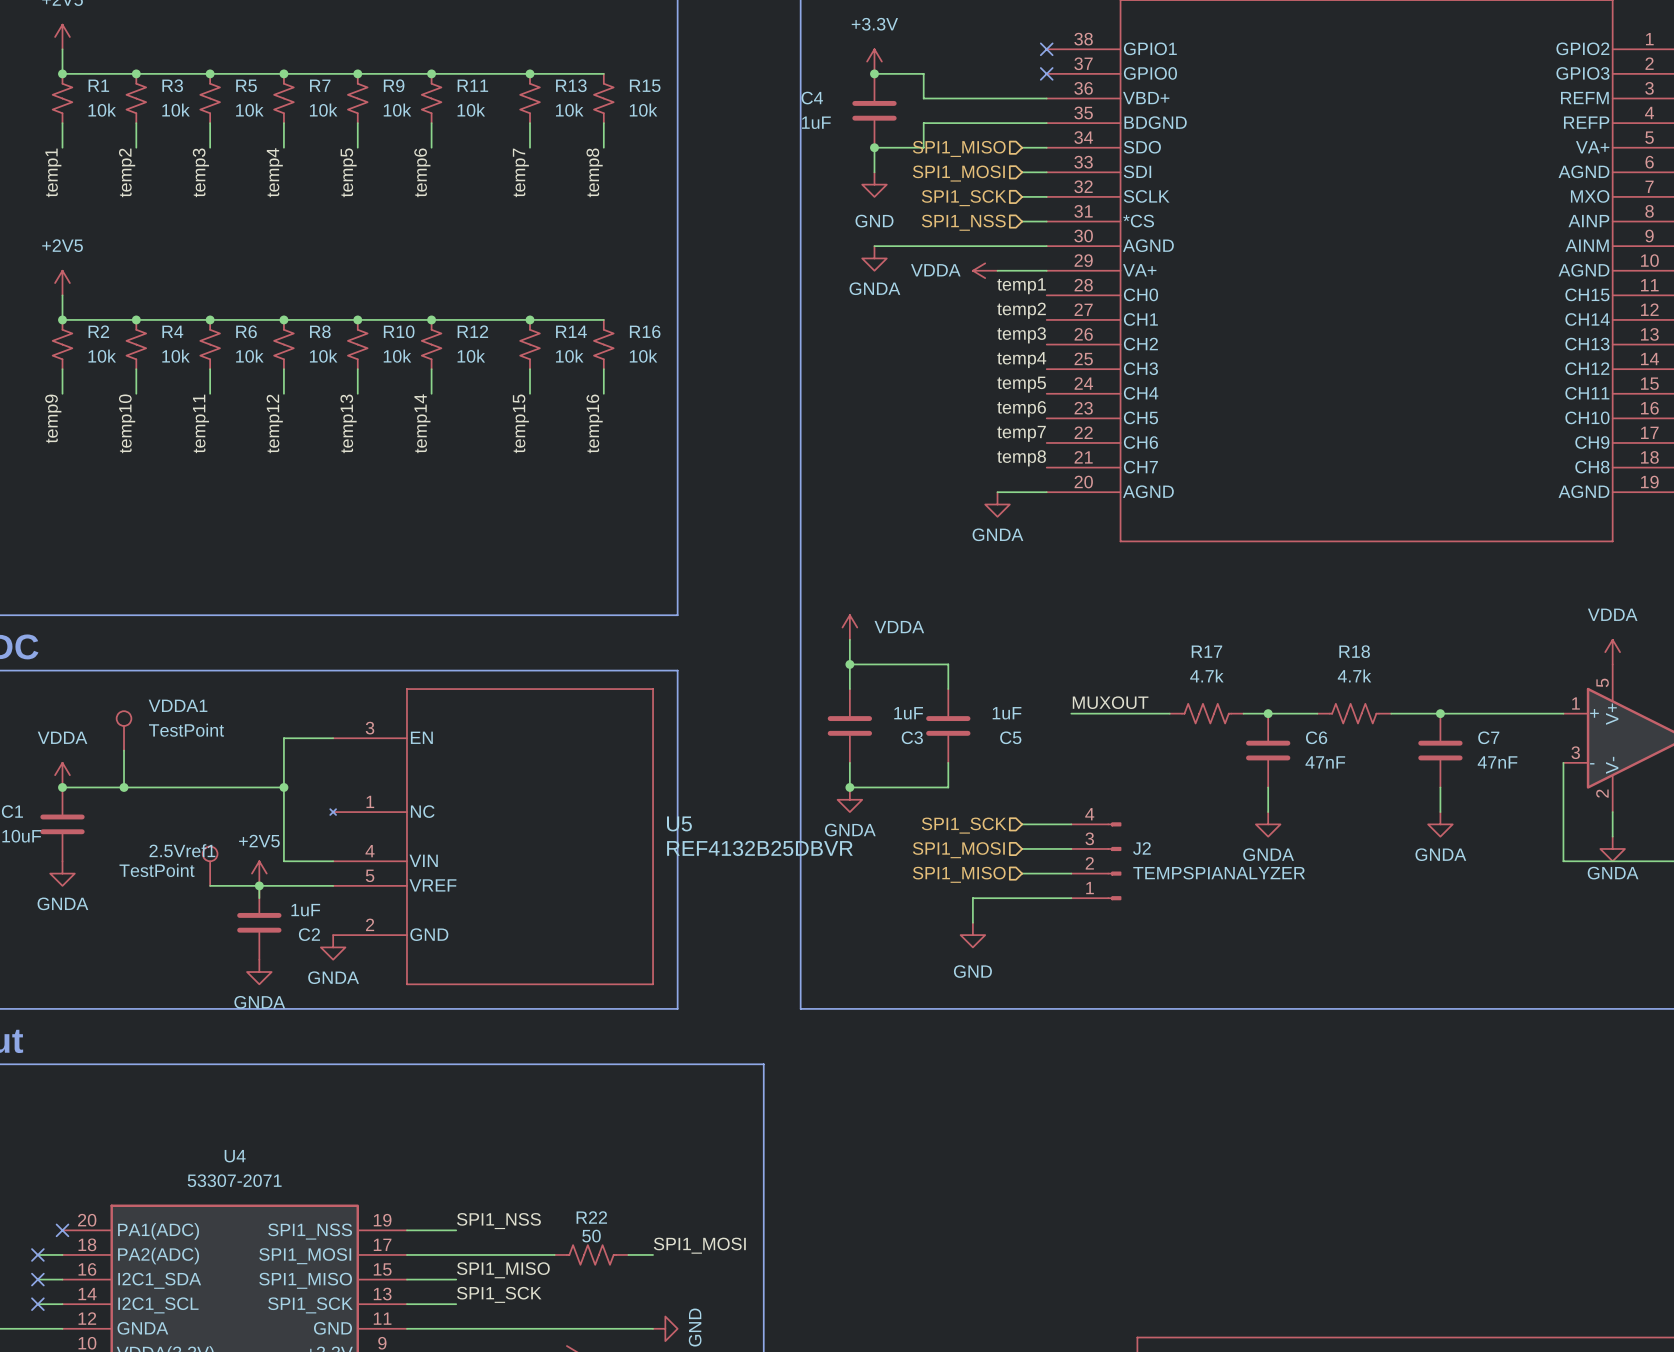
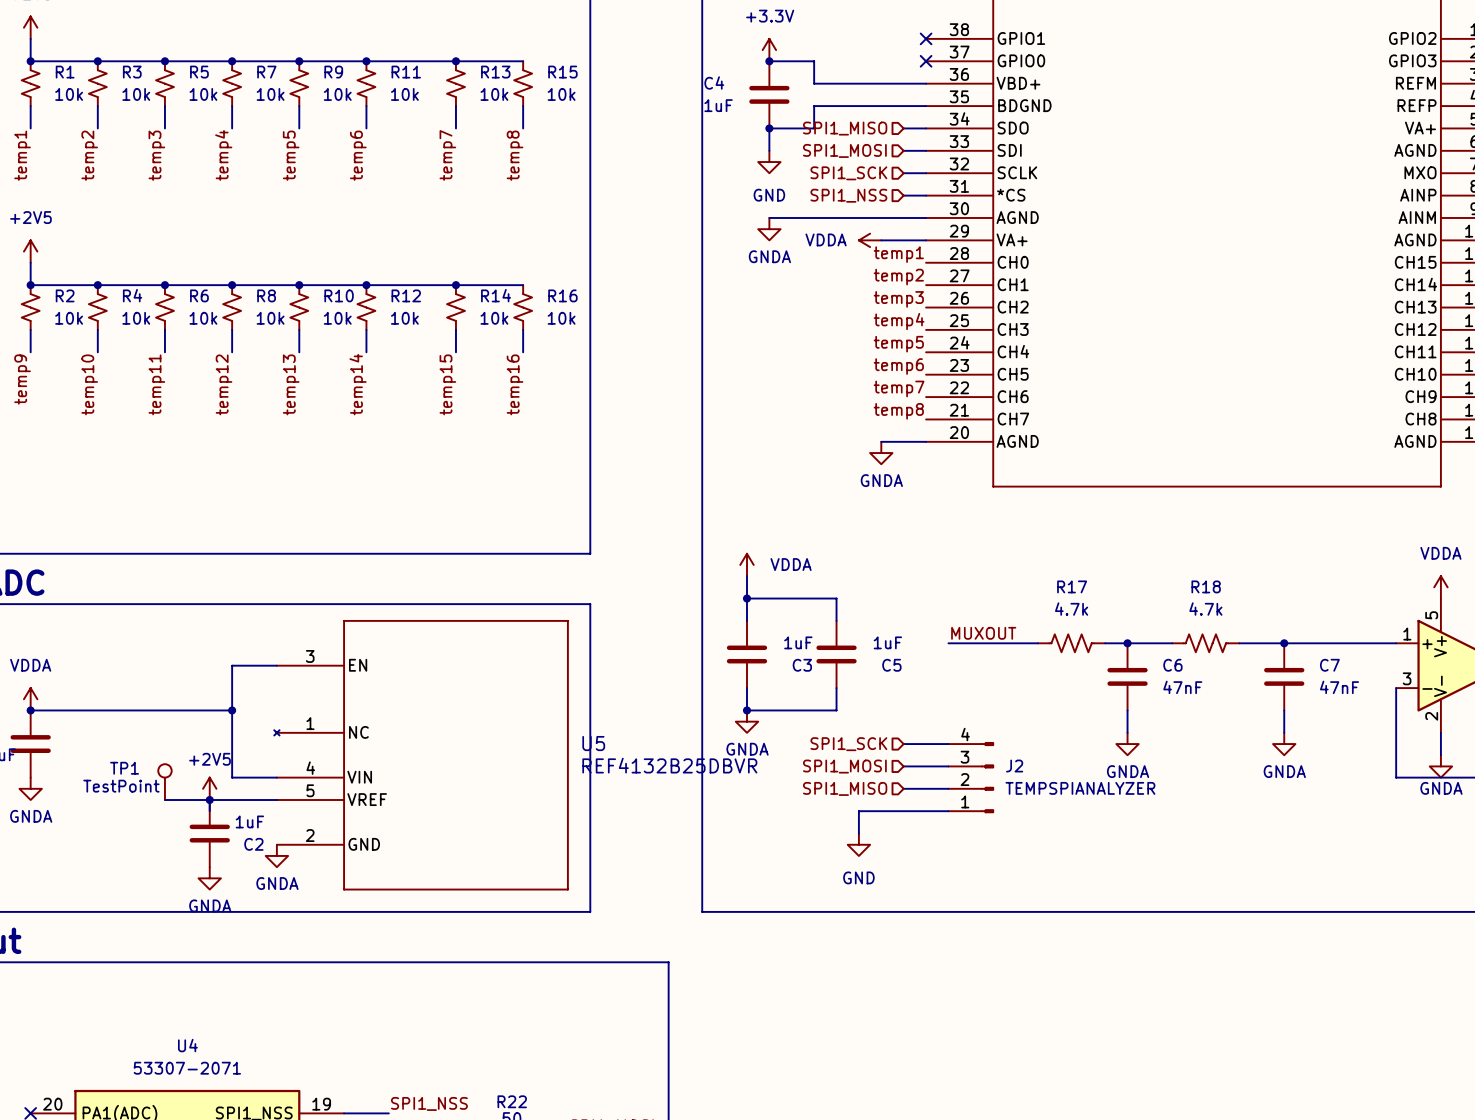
VDDA1: TestPoint (124, 730) -> none
wire: (124, 750) (124, 787) -> none
junction: (124, 787) -> none
2.5Vref1 name: 2.5Vref1 (182, 850) -> TP1 (124, 768)

